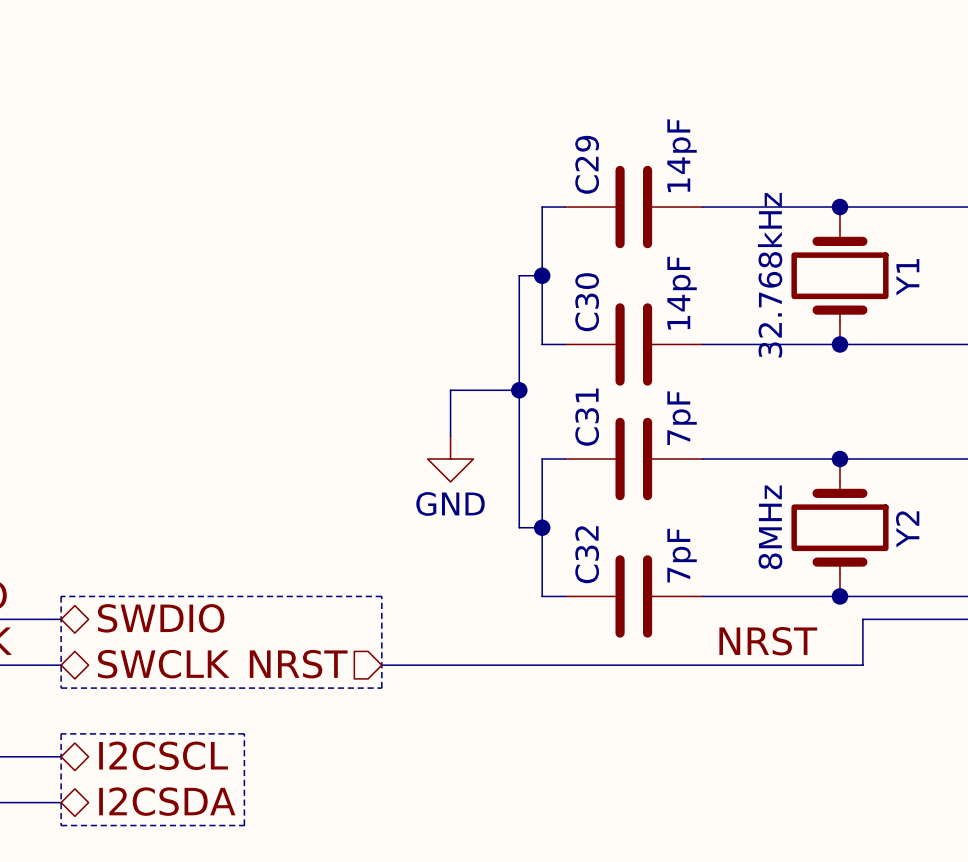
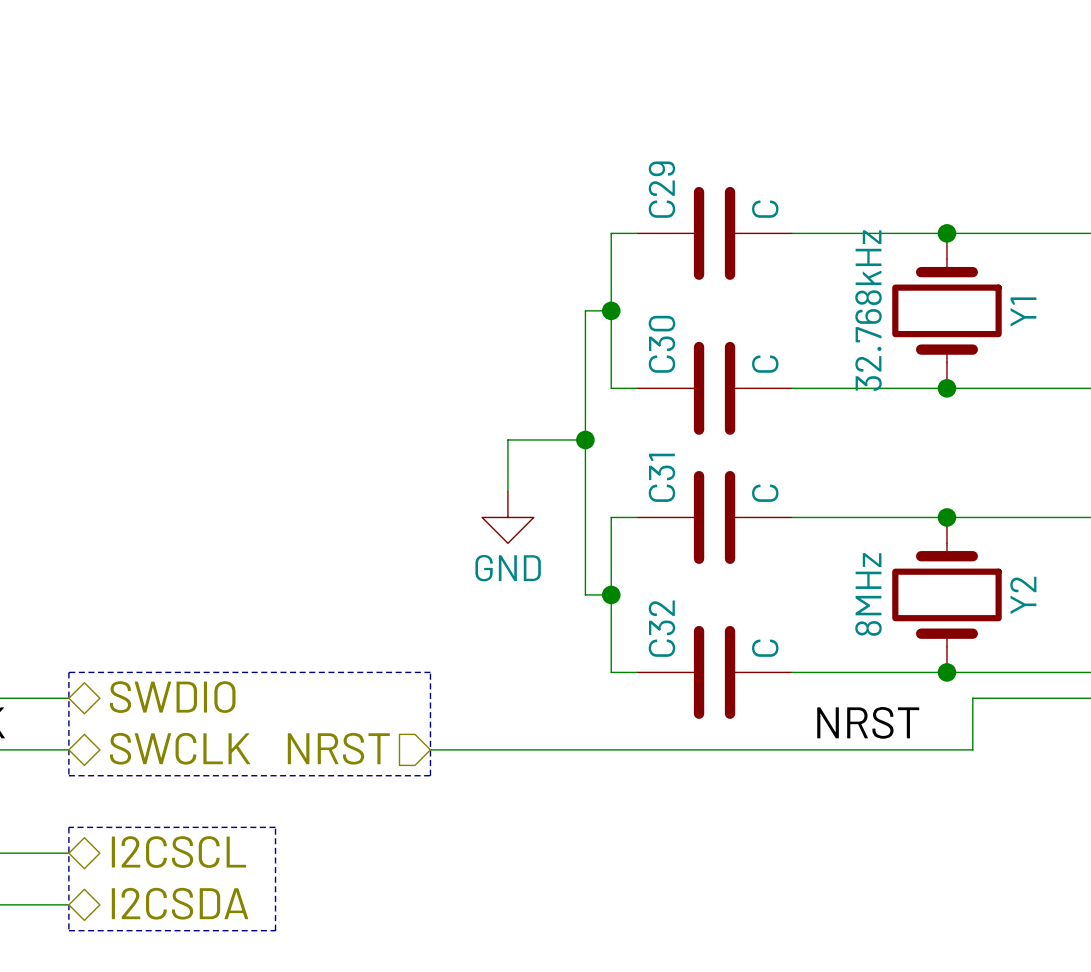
C29 value: 14pF (682, 155) -> C (765, 209)
C30 value: 14pF (682, 293) -> C (765, 364)
C31 value: 7pF (682, 418) -> C (765, 493)
C32 value: 7pF (682, 555) -> C (765, 648)

